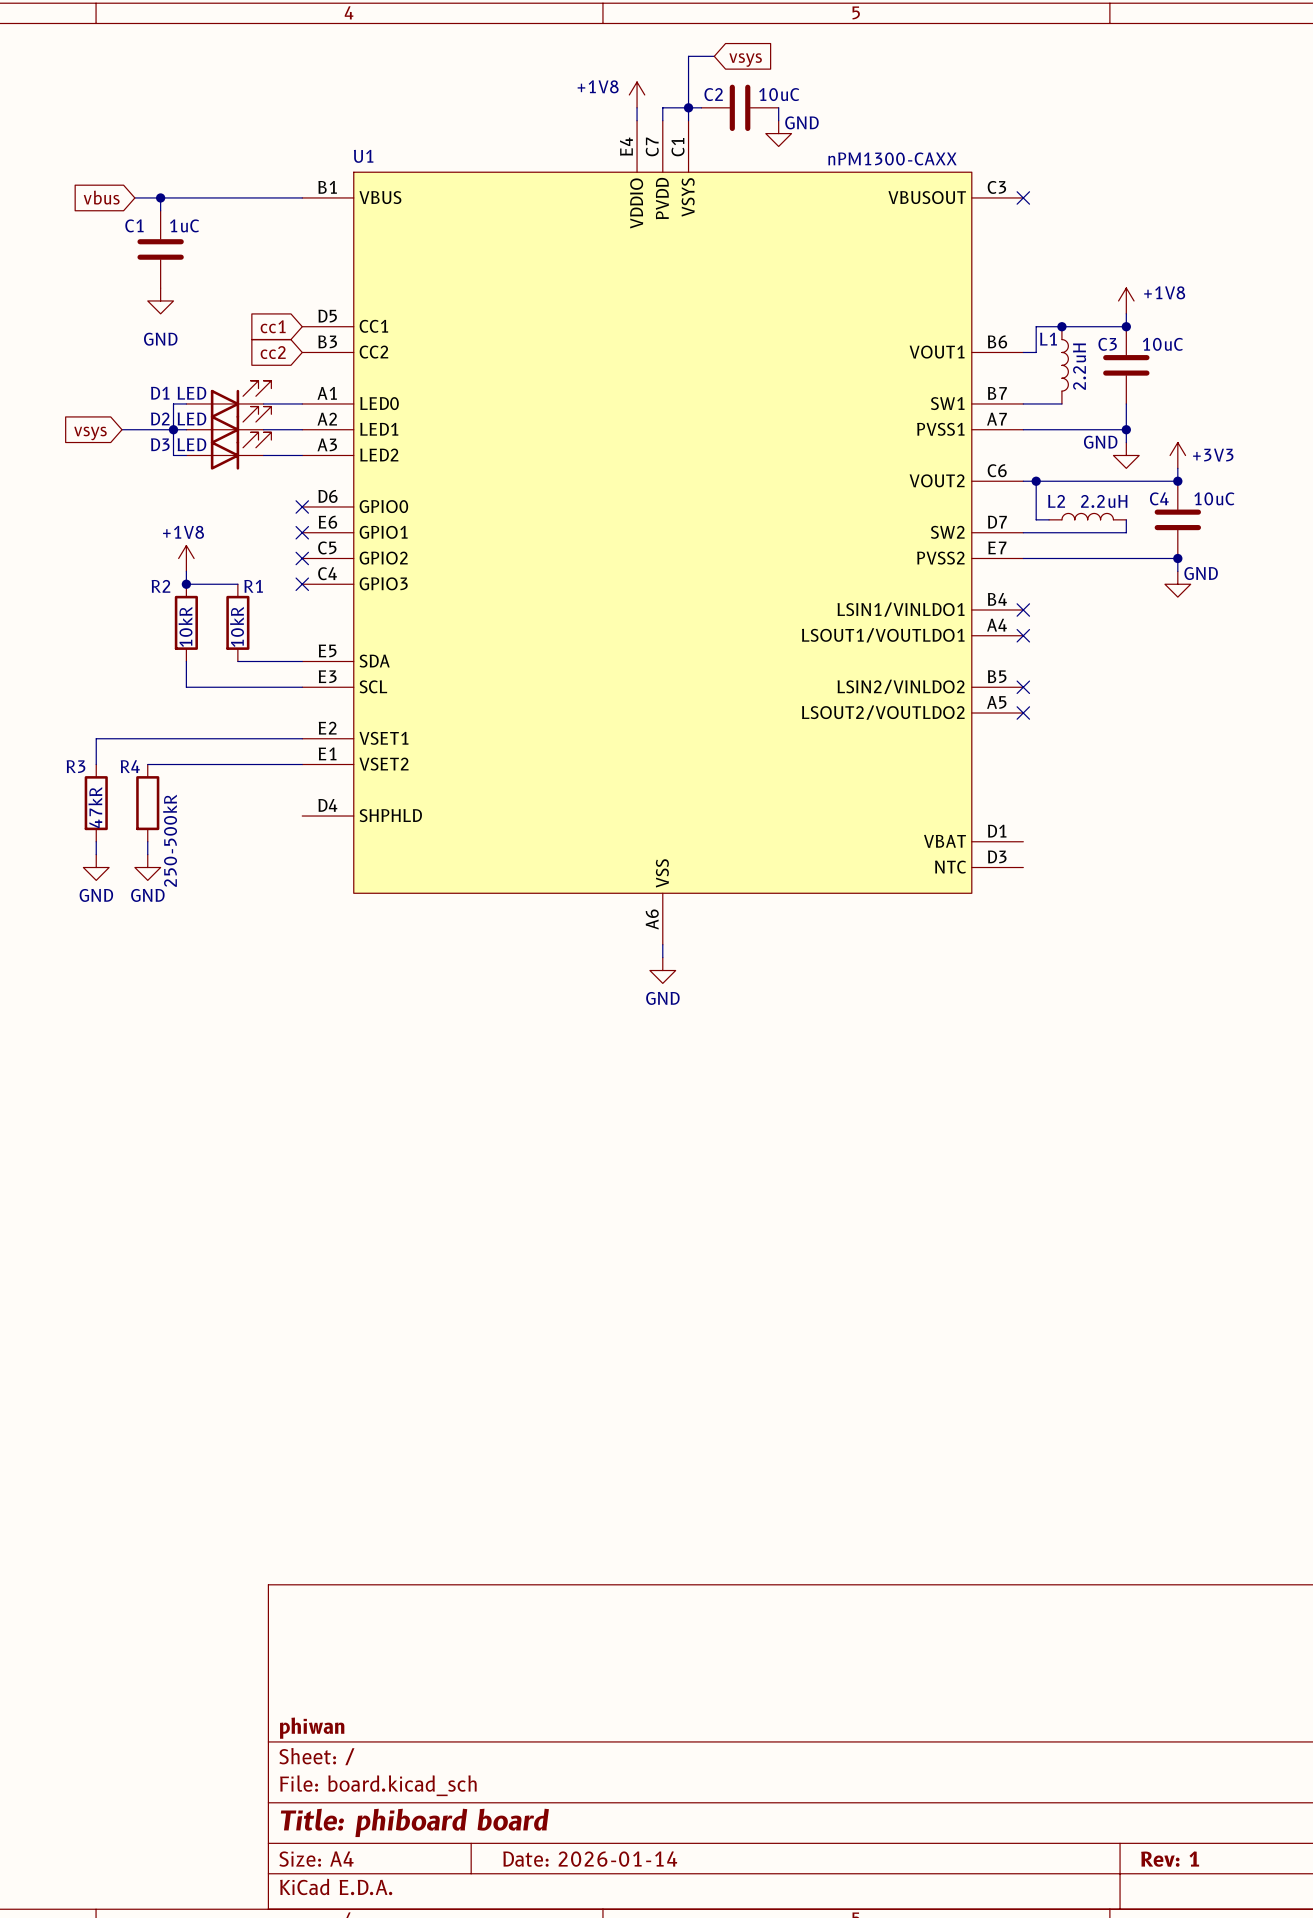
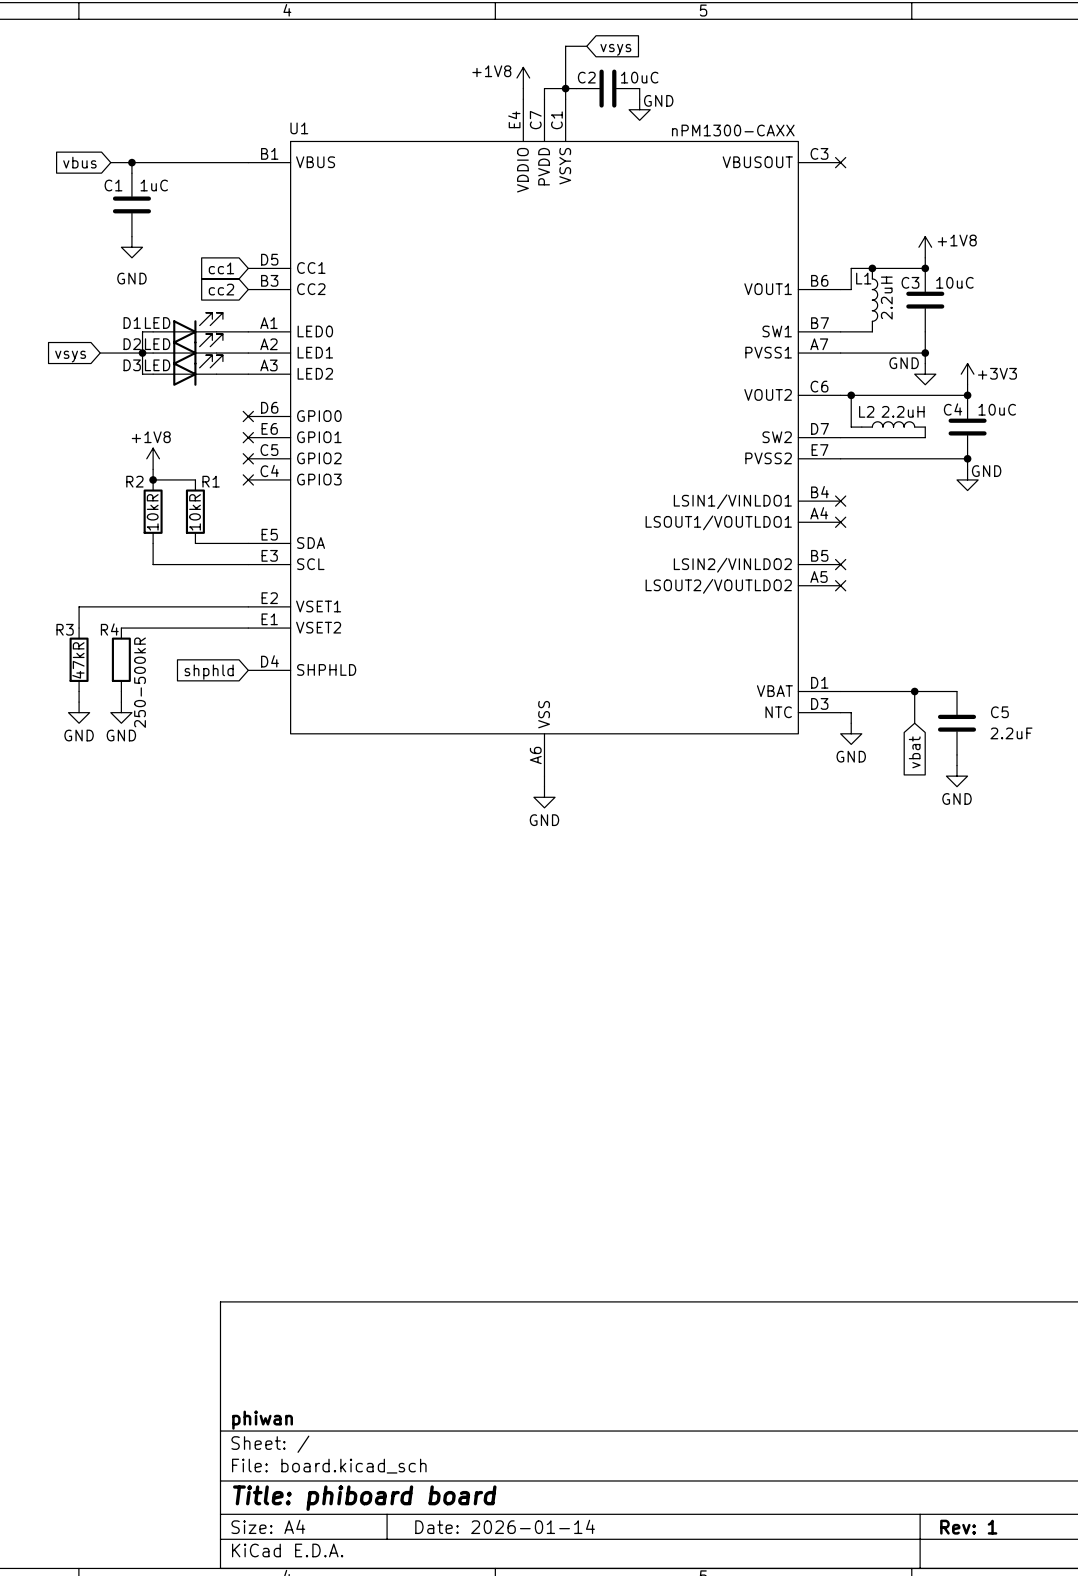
global label: none -> shphld (209, 672)
wire: none -> (840, 691) (957, 691)
wire: none -> (914, 691) (914, 723)
junction: none -> (914, 691)
wire: none -> (840, 712) (851, 712) (851, 723)
C5: none -> 2.2uF (957, 723)
power symbol: none -> GND (851, 733)
global label: none -> vbat (914, 752)
wire: none -> (957, 754) (957, 765)
power symbol: none -> GND (957, 776)

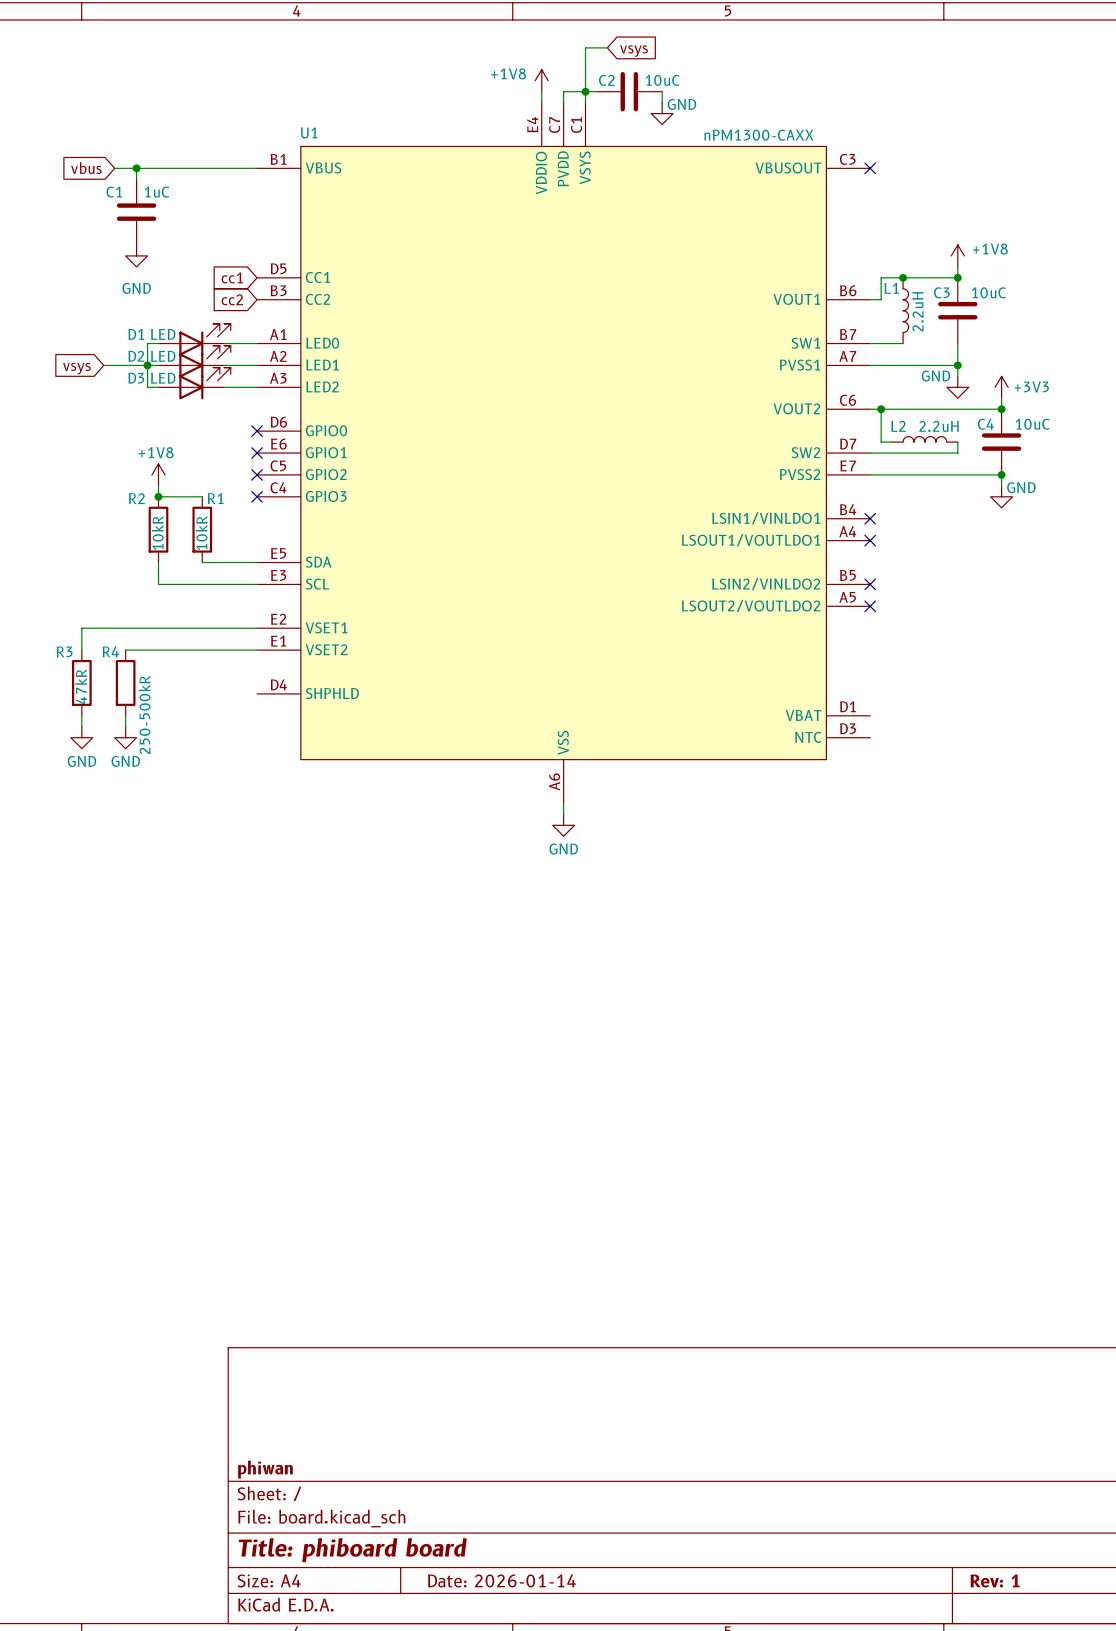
global label: shphld (209, 672) -> none
wire: (840, 691) (957, 691) -> none
wire: (914, 691) (914, 723) -> none
junction: (914, 691) -> none
wire: (840, 712) (851, 712) (851, 723) -> none
C5: 2.2uF (957, 723) -> none
power symbol: GND (851, 733) -> none
global label: vbat (914, 752) -> none
wire: (957, 754) (957, 765) -> none
power symbol: GND (957, 776) -> none

